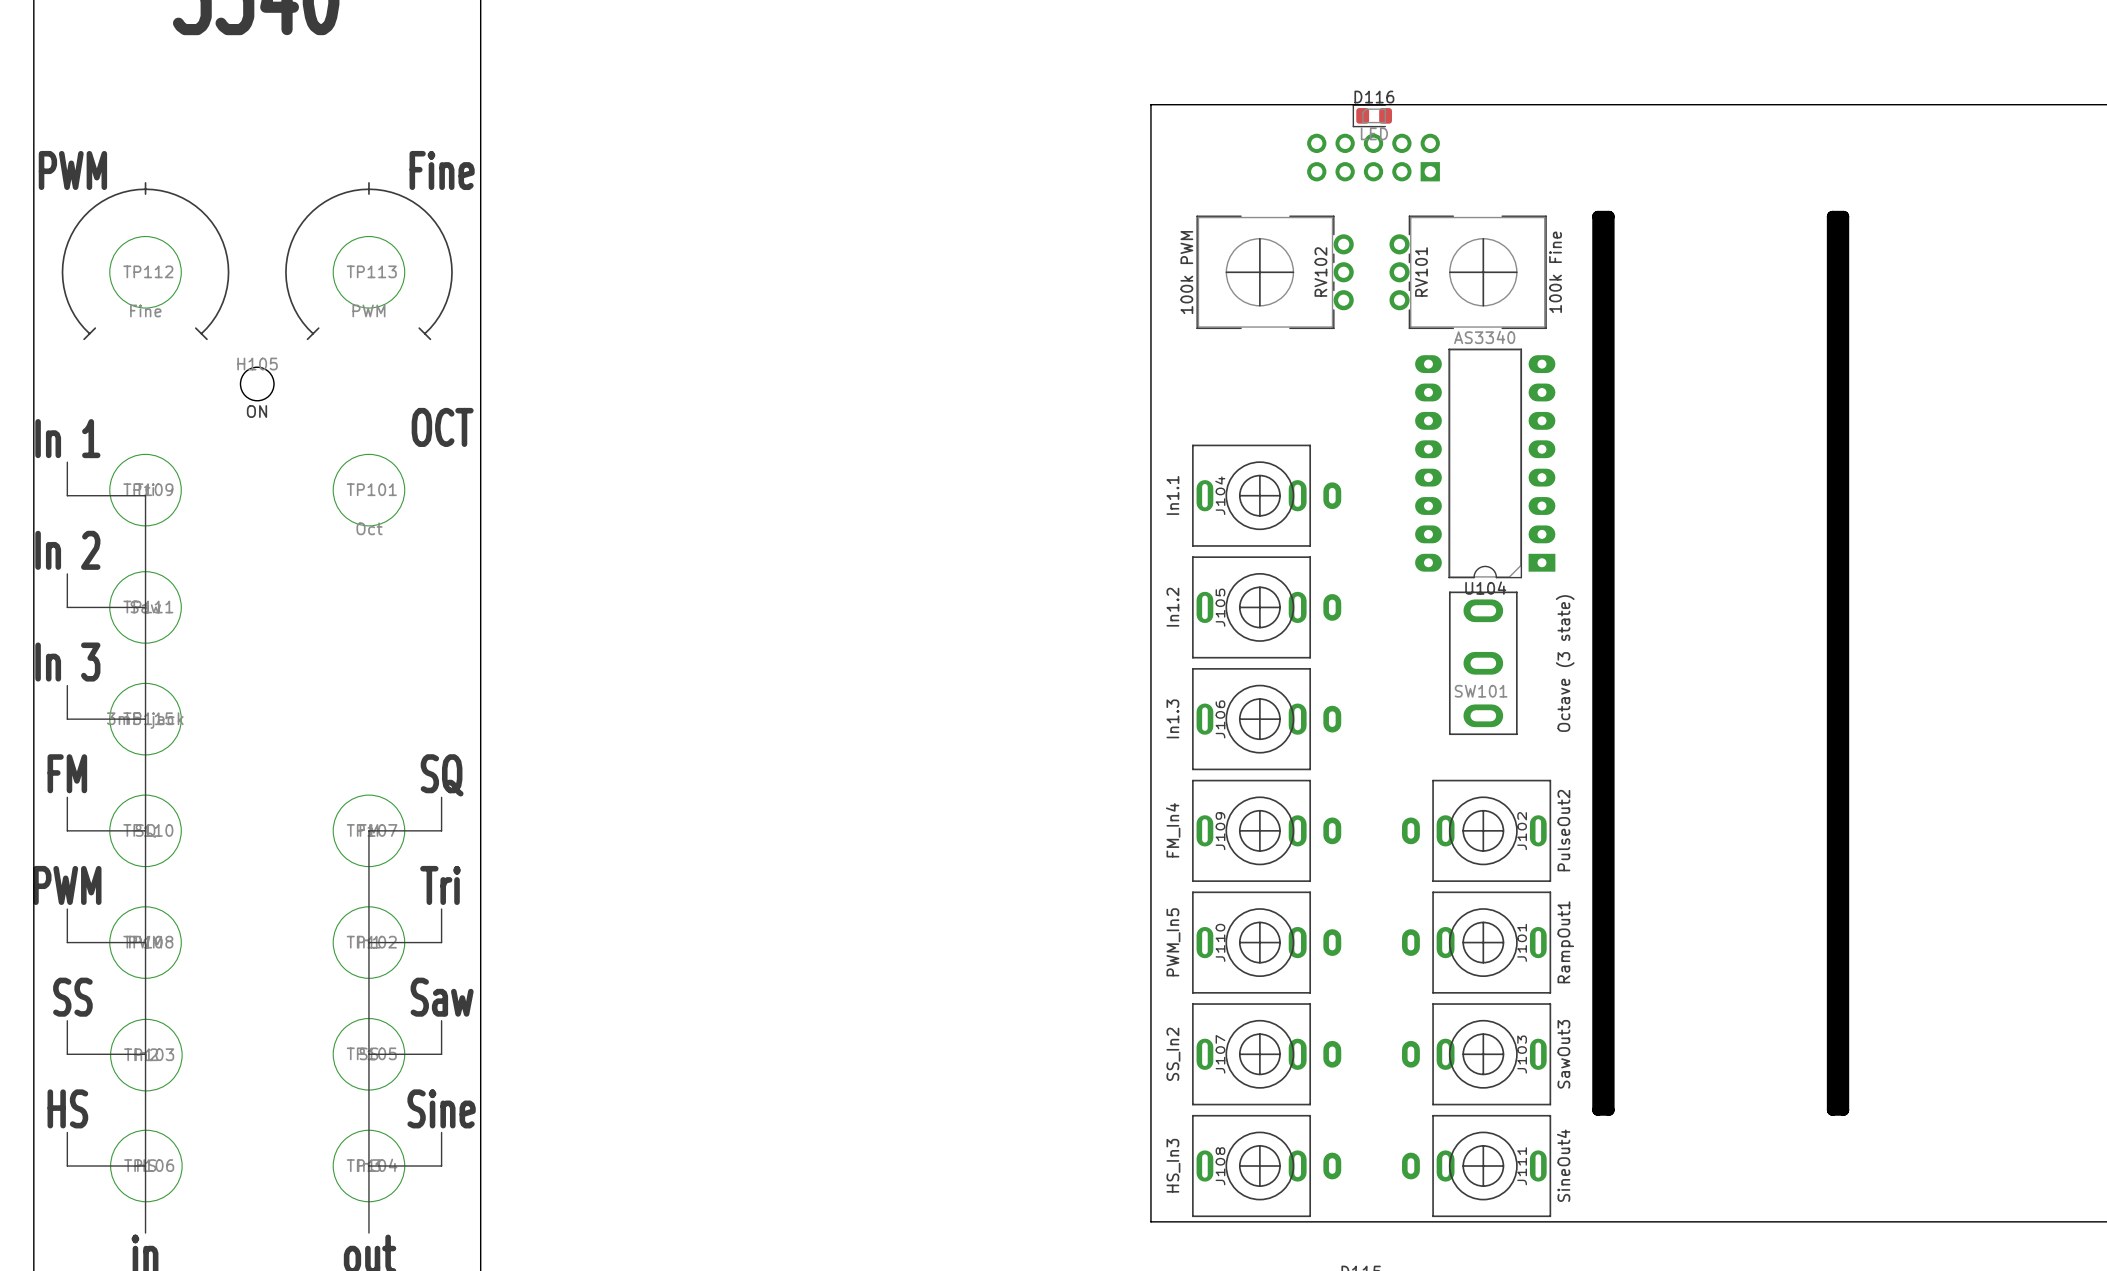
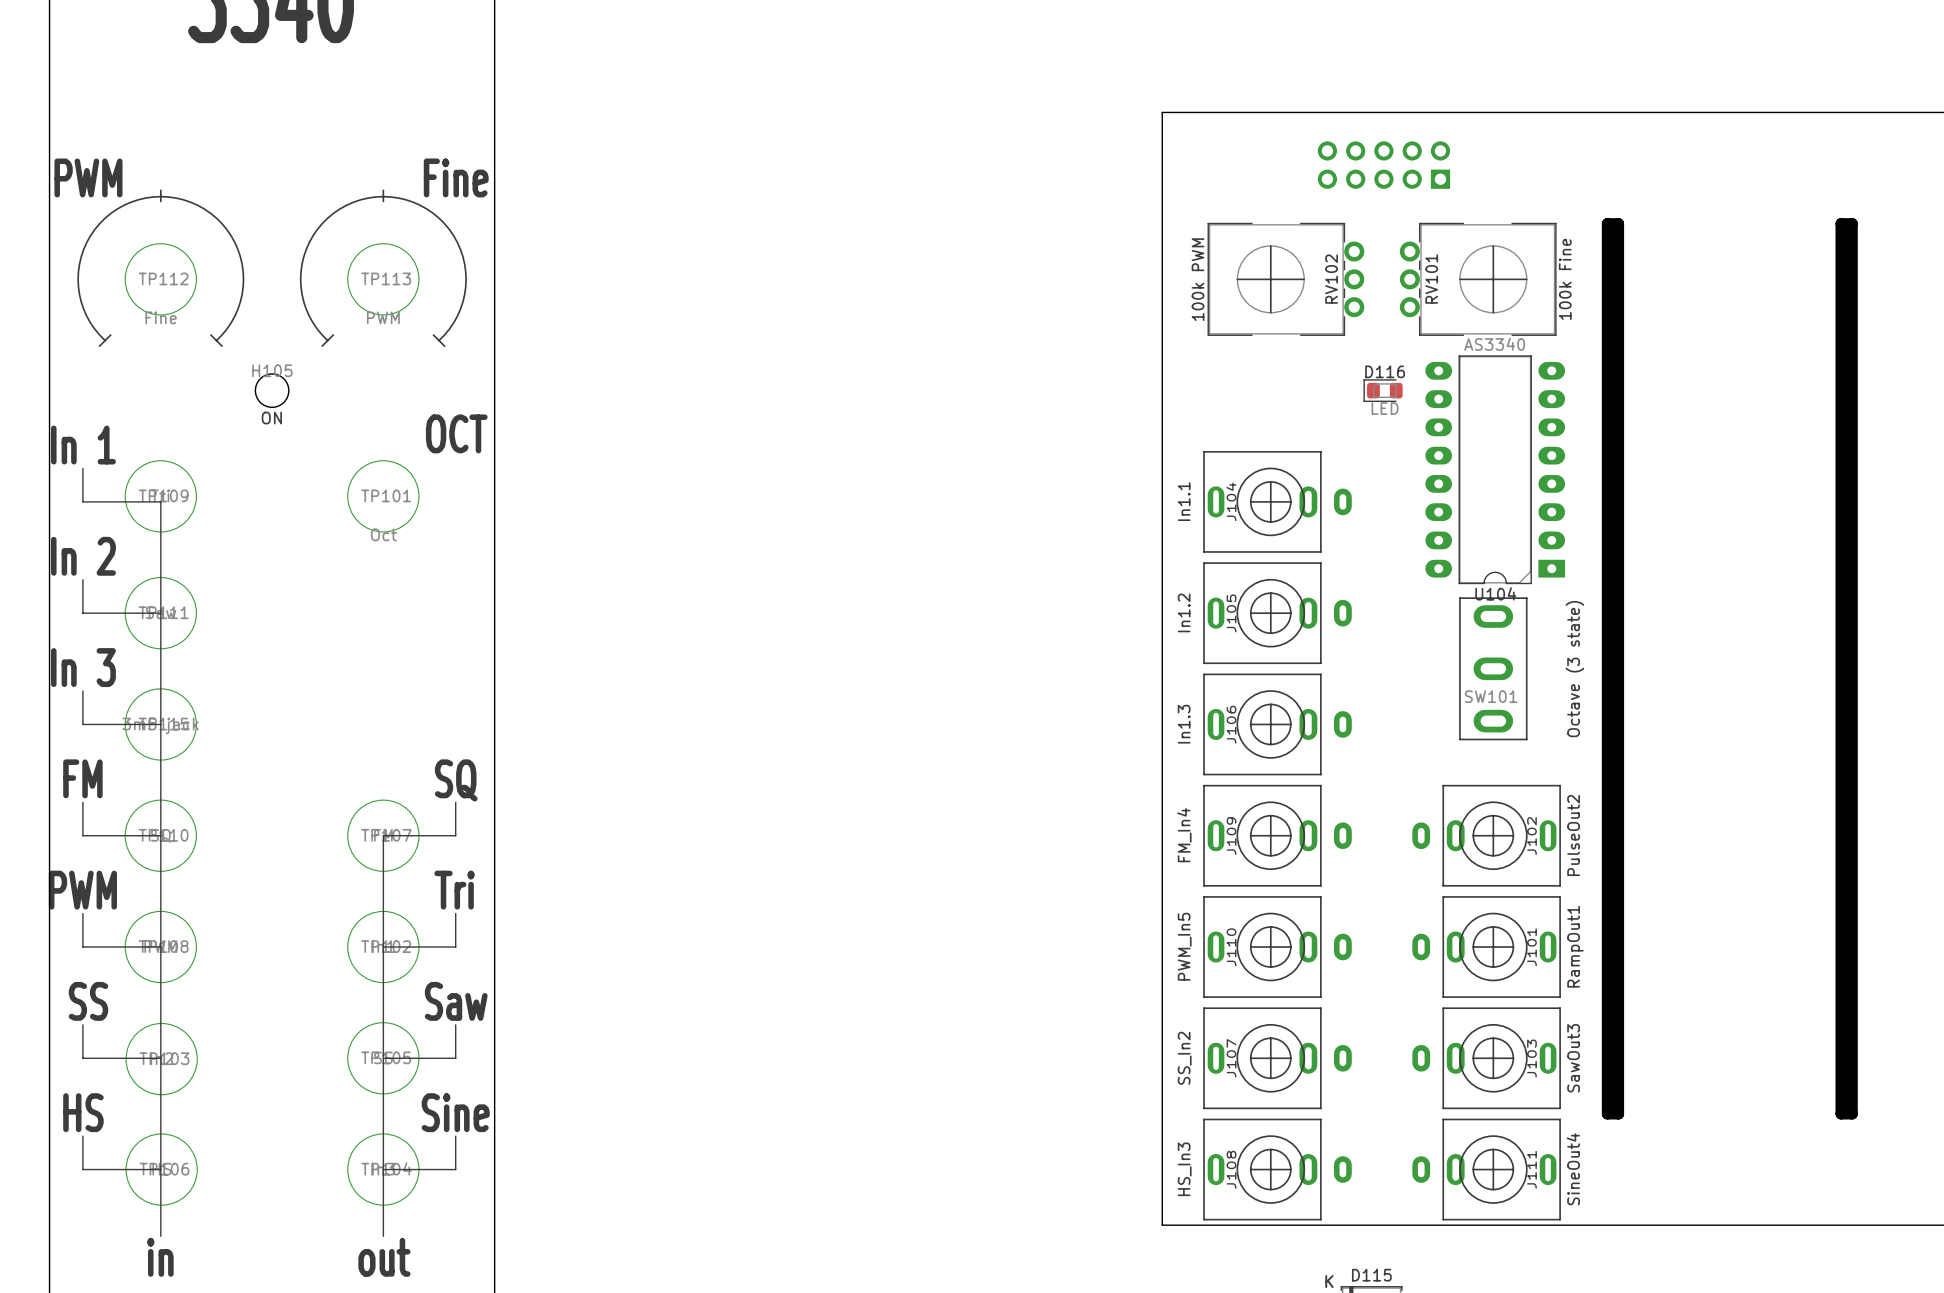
D116 position: (1372, 115) -> (1383, 390)

